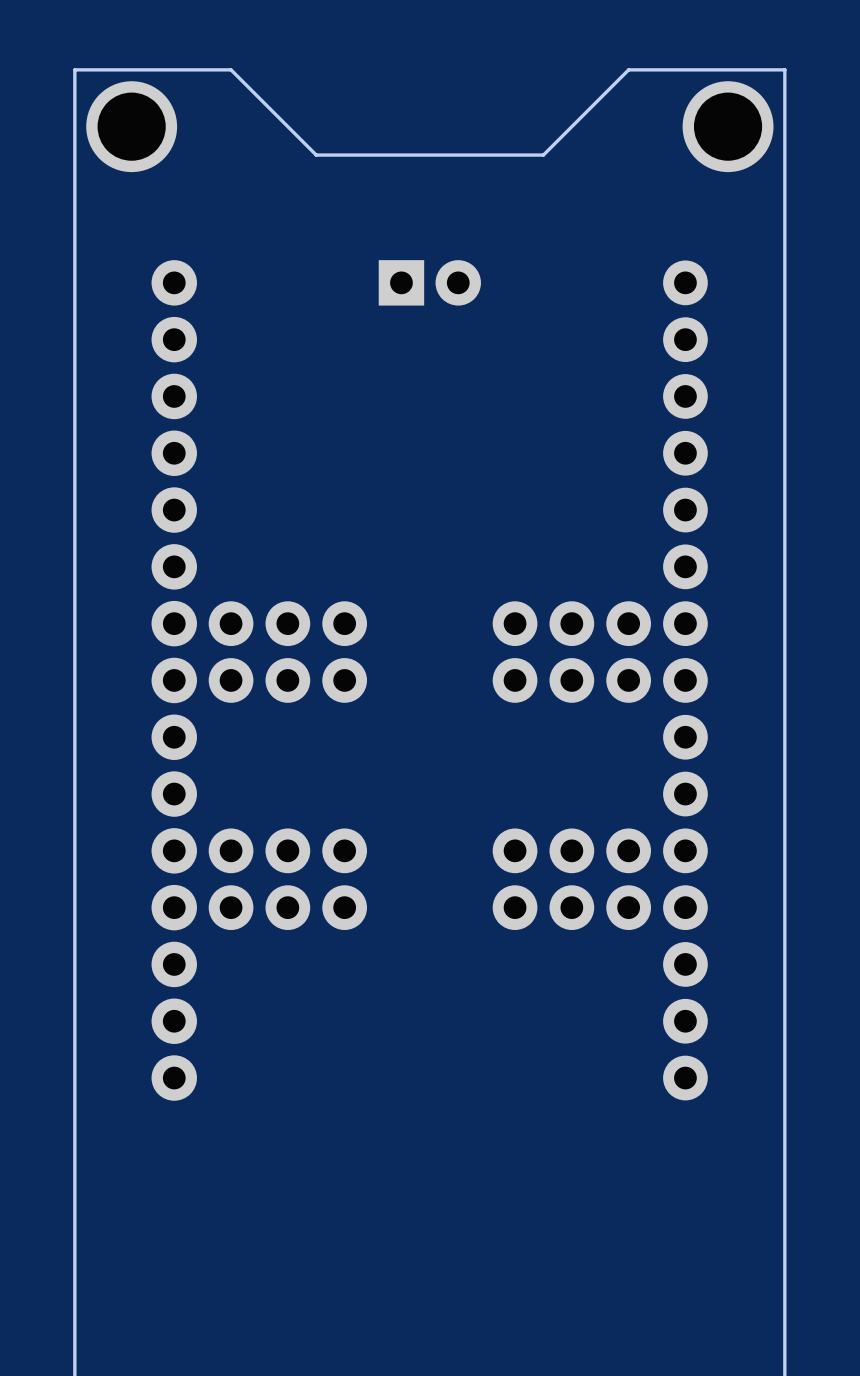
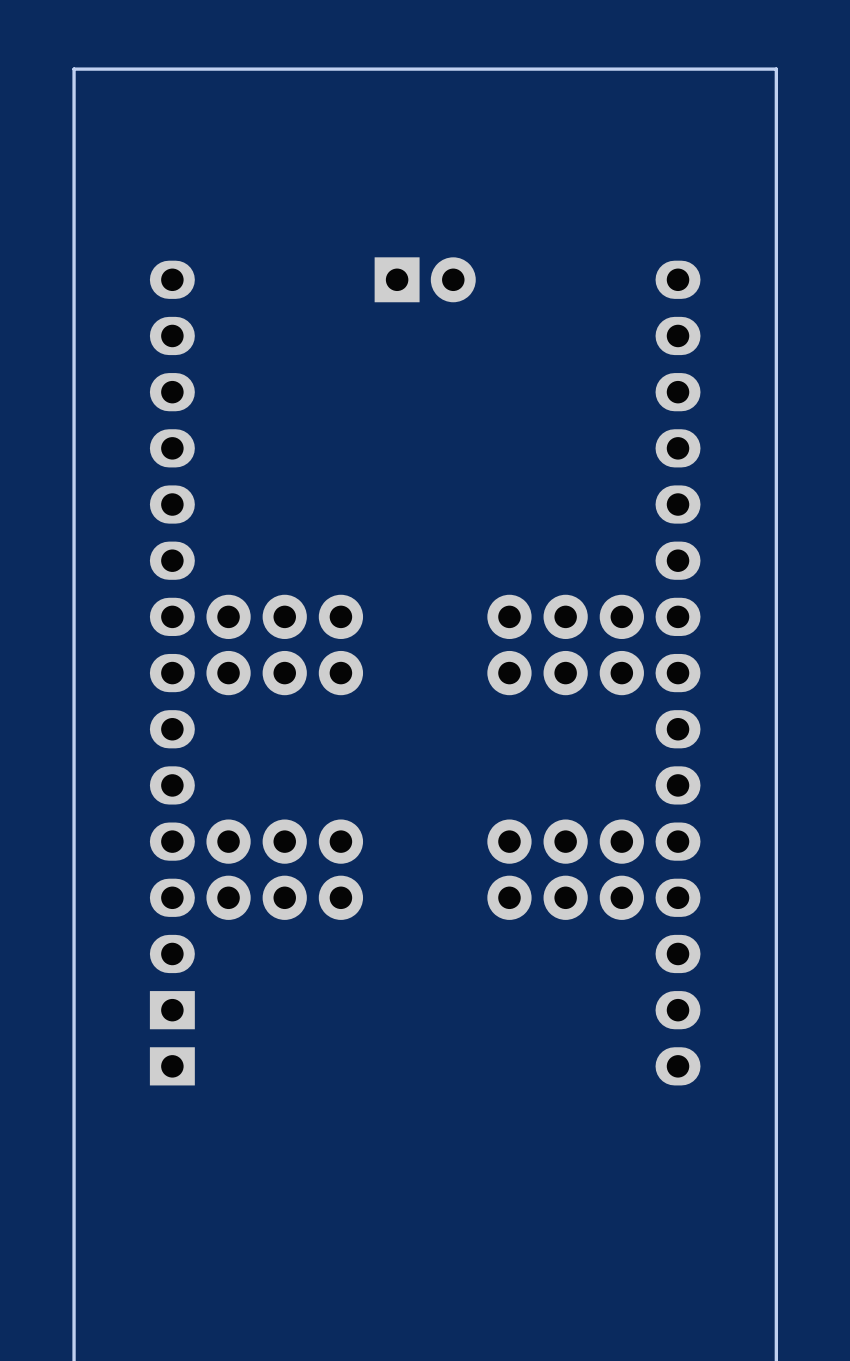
board edge: (628, 69) (543, 155) (316, 155) (231, 69) -> (621, 69) (228, 69)
part: (131, 126) -> none
part: (728, 126) -> none
part footprint: [151, 260, 197, 1101] -> [149, 260, 195, 1086]
part footprint: [663, 260, 708, 1101] -> [655, 260, 701, 1086]

